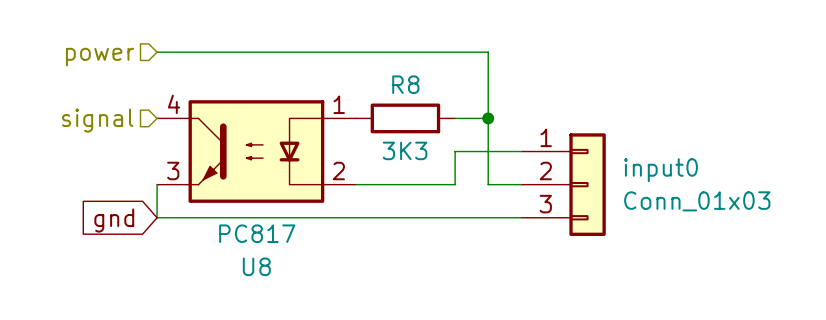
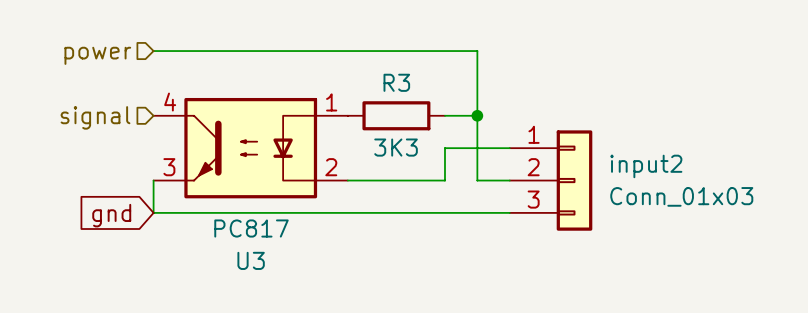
R8 name: R8 (405, 84) -> R3 (396, 82)
input0 name: input0 (661, 170) -> input2 (646, 166)
U8 name: U8 (256, 266) -> U3 (251, 260)

